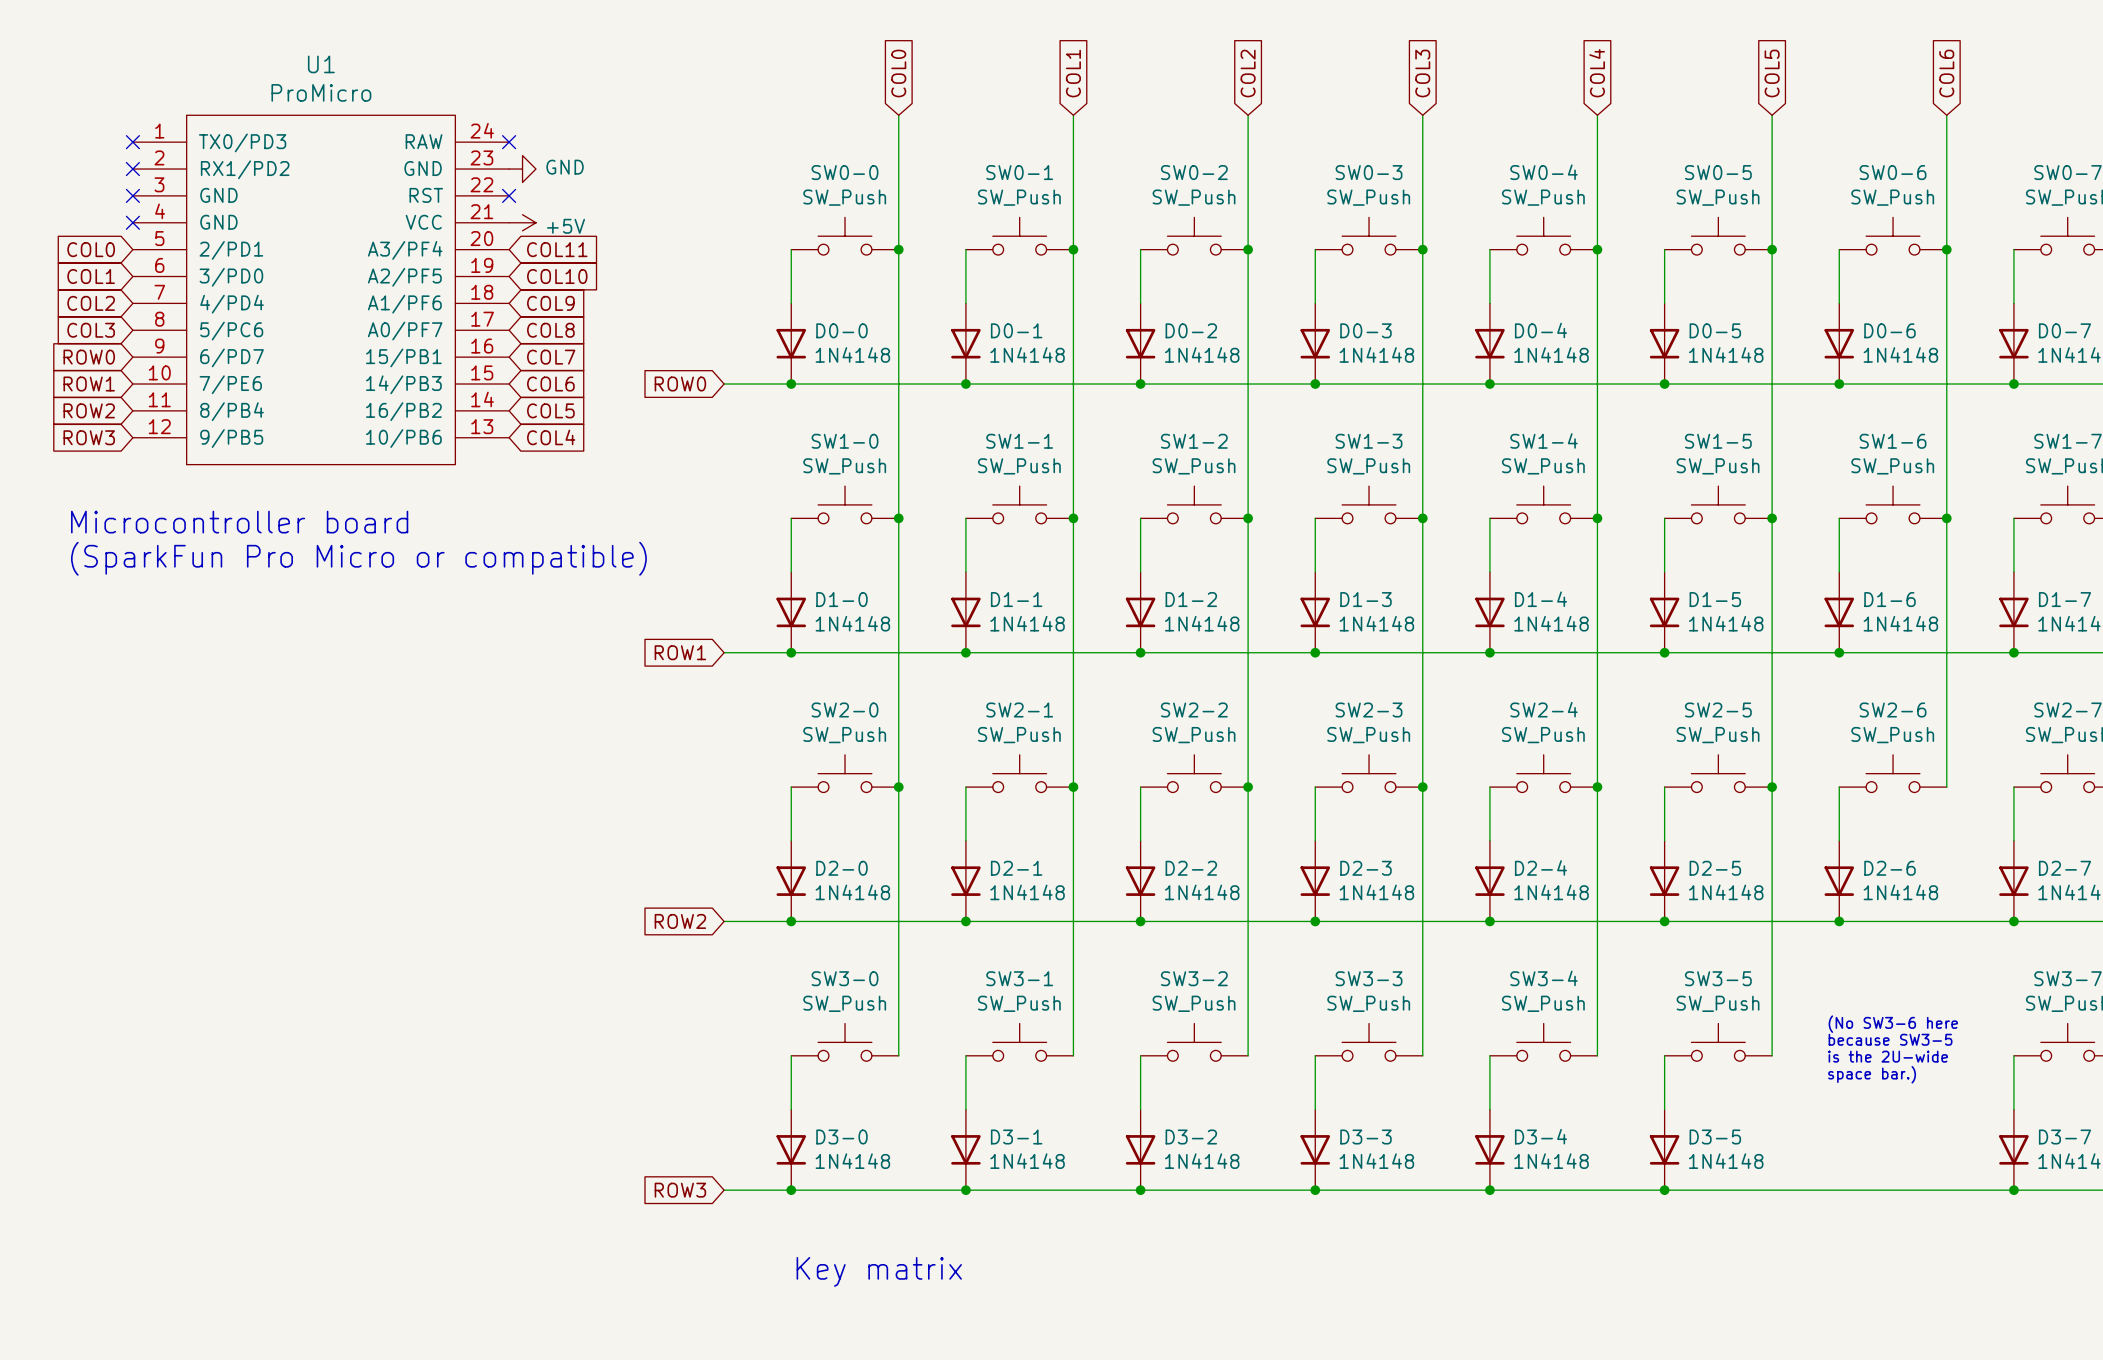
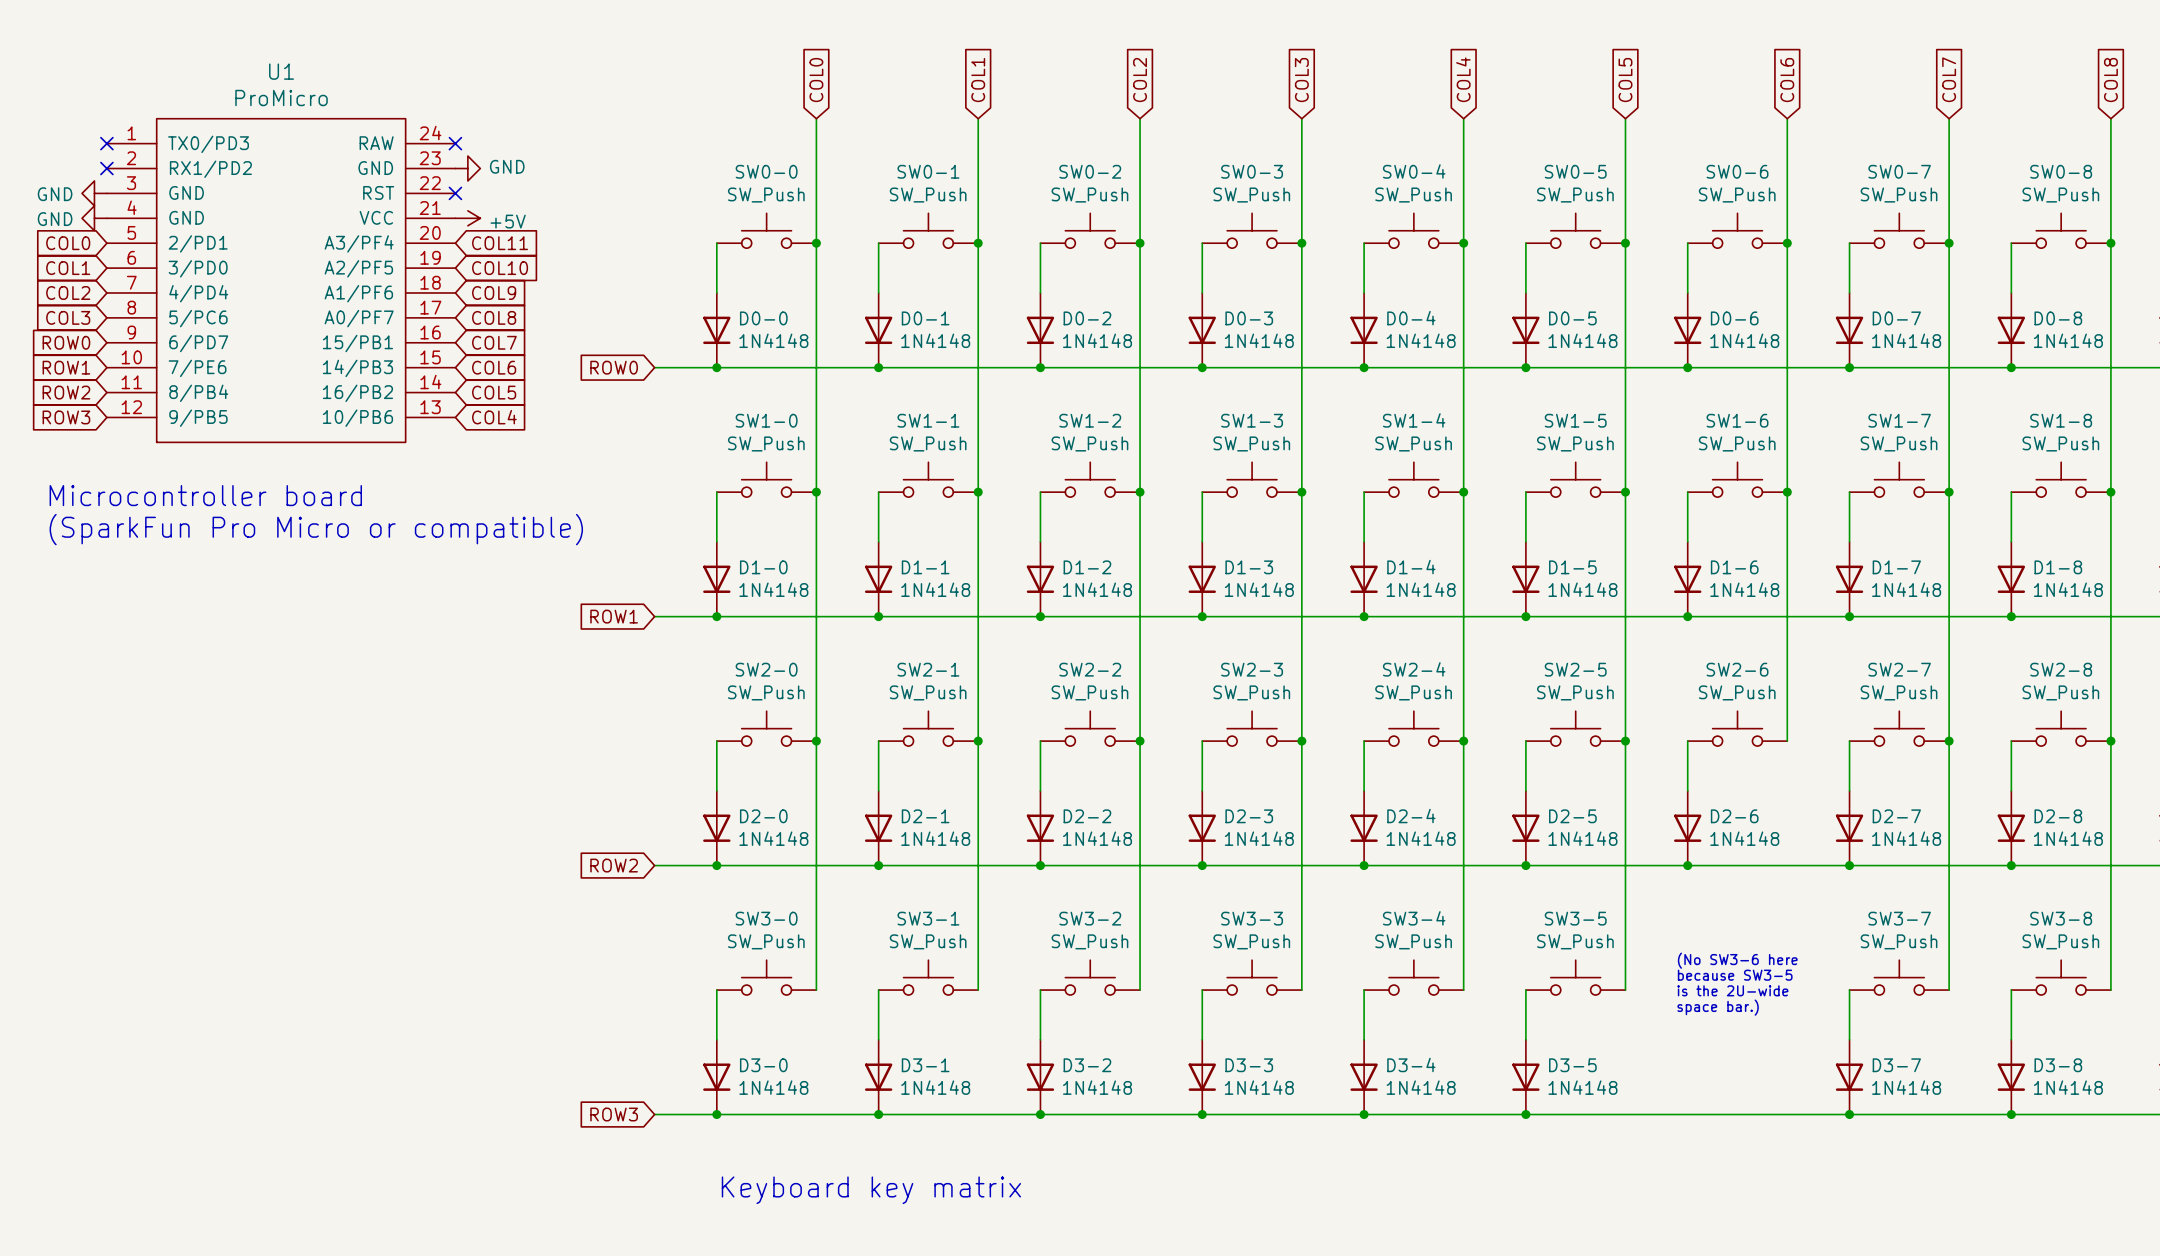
power symbol: none -> GND (94, 193)
no-connect mark: (132, 195) -> none
power symbol: none -> GND (94, 218)
no-connect mark: (132, 222) -> none
text: Key matrix (879, 1271) -> Keyboard key matrix (871, 1190)

